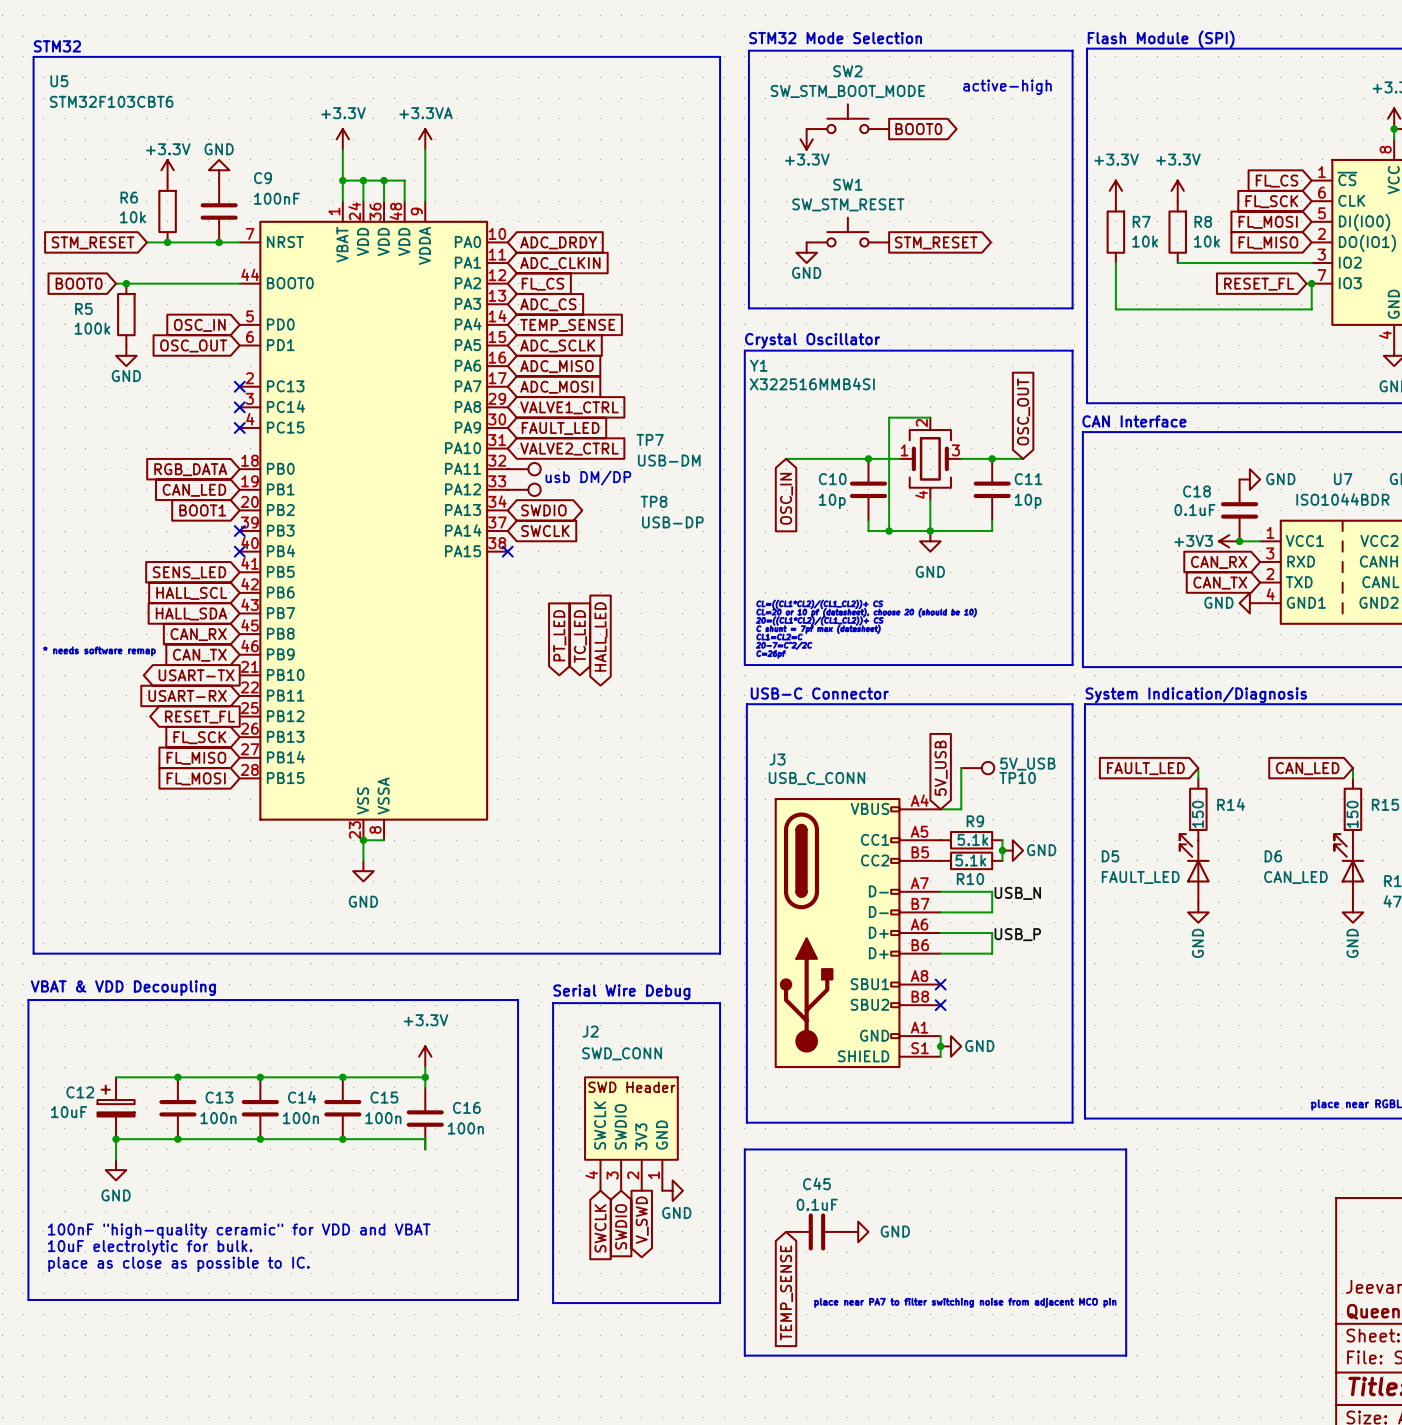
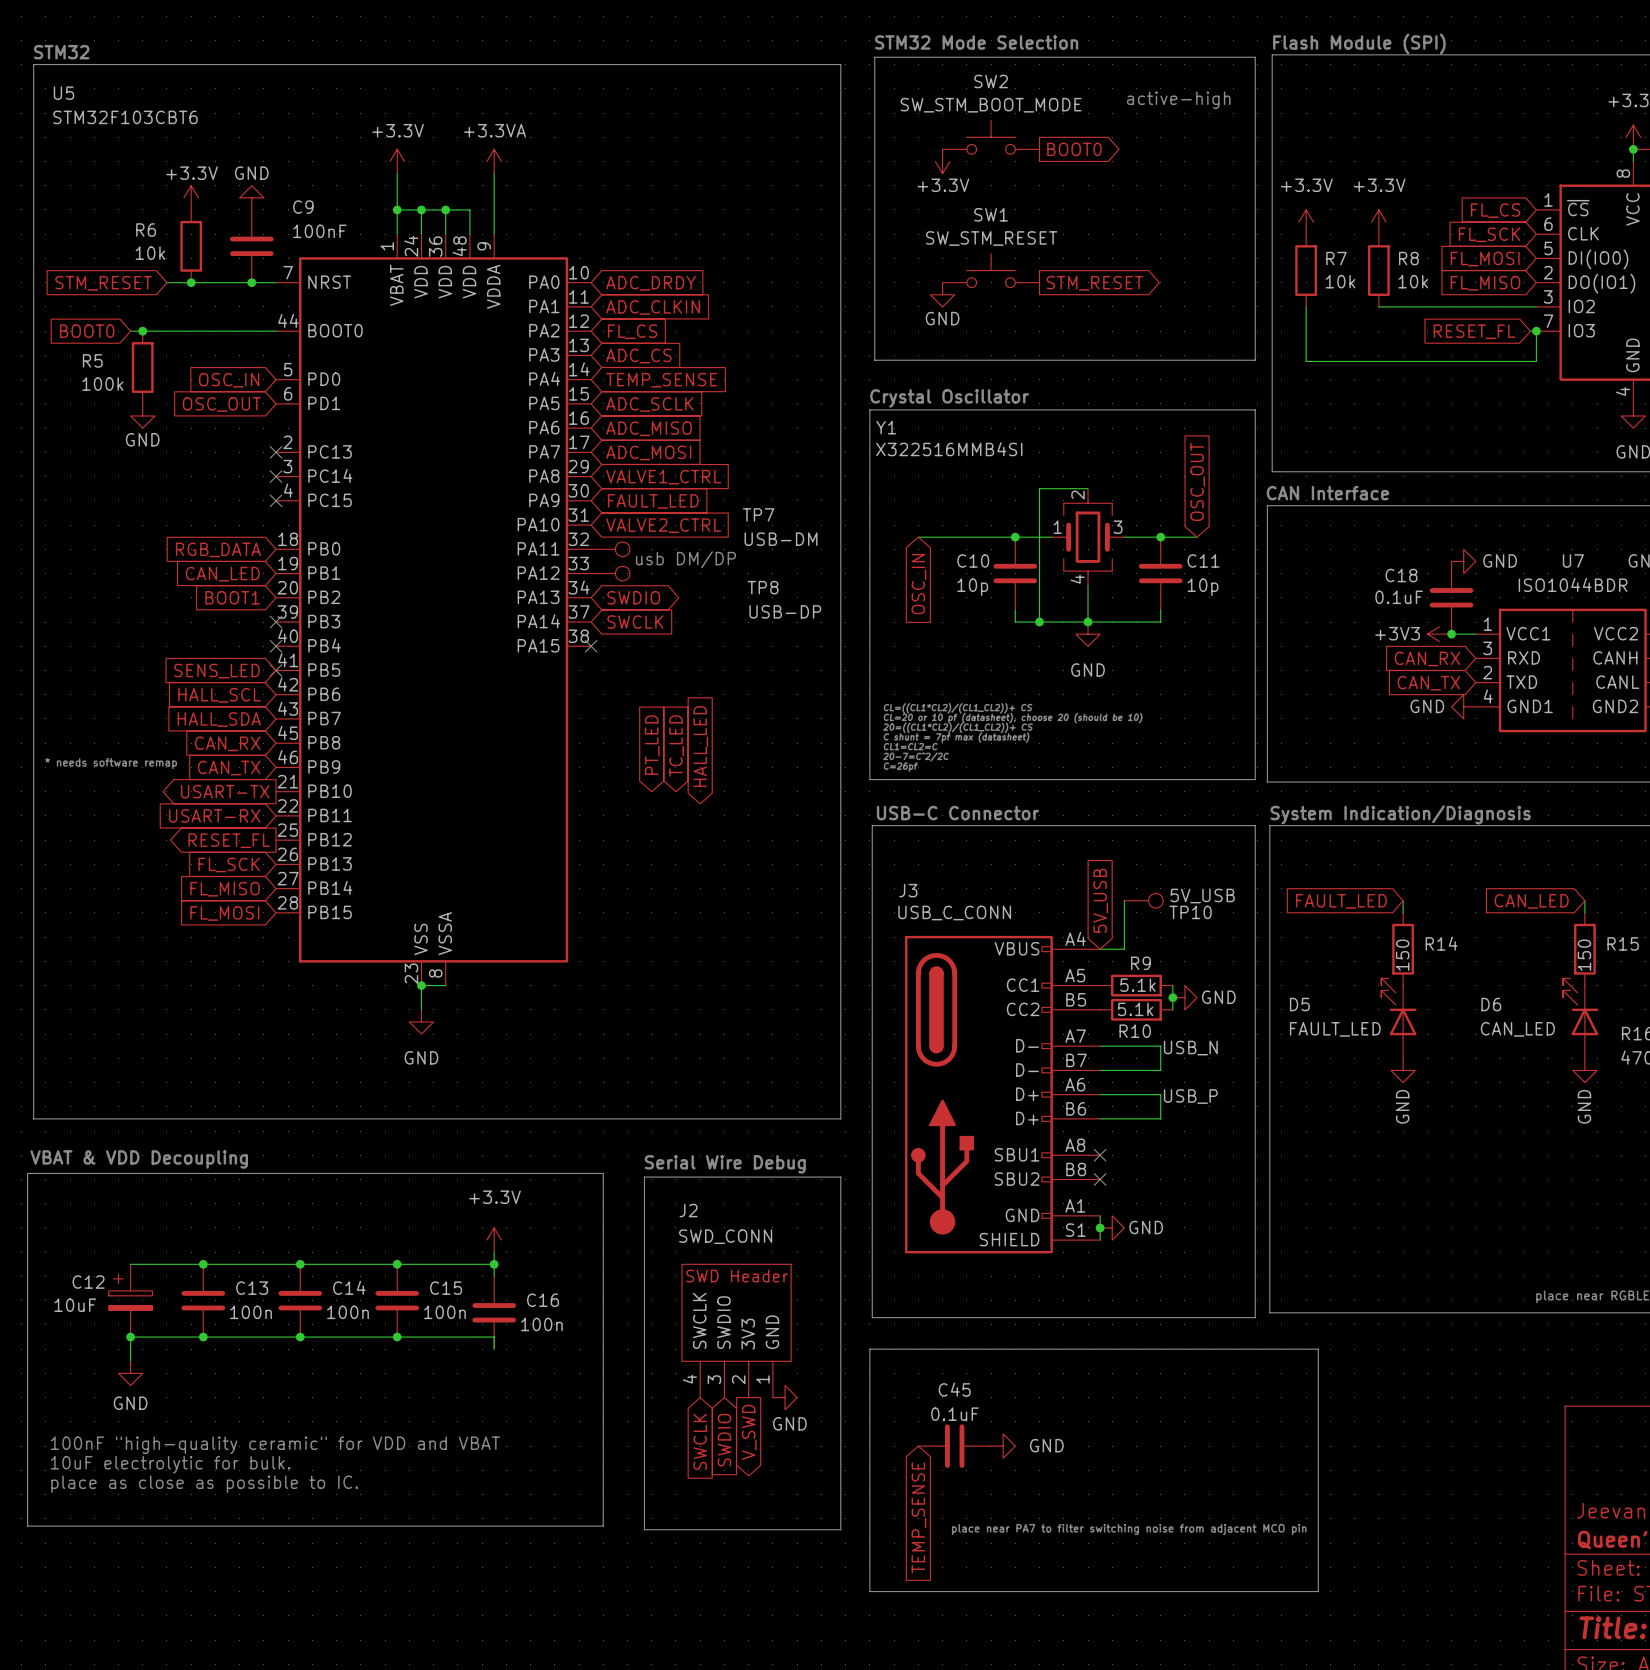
no-connect mark: none -> (276, 670)

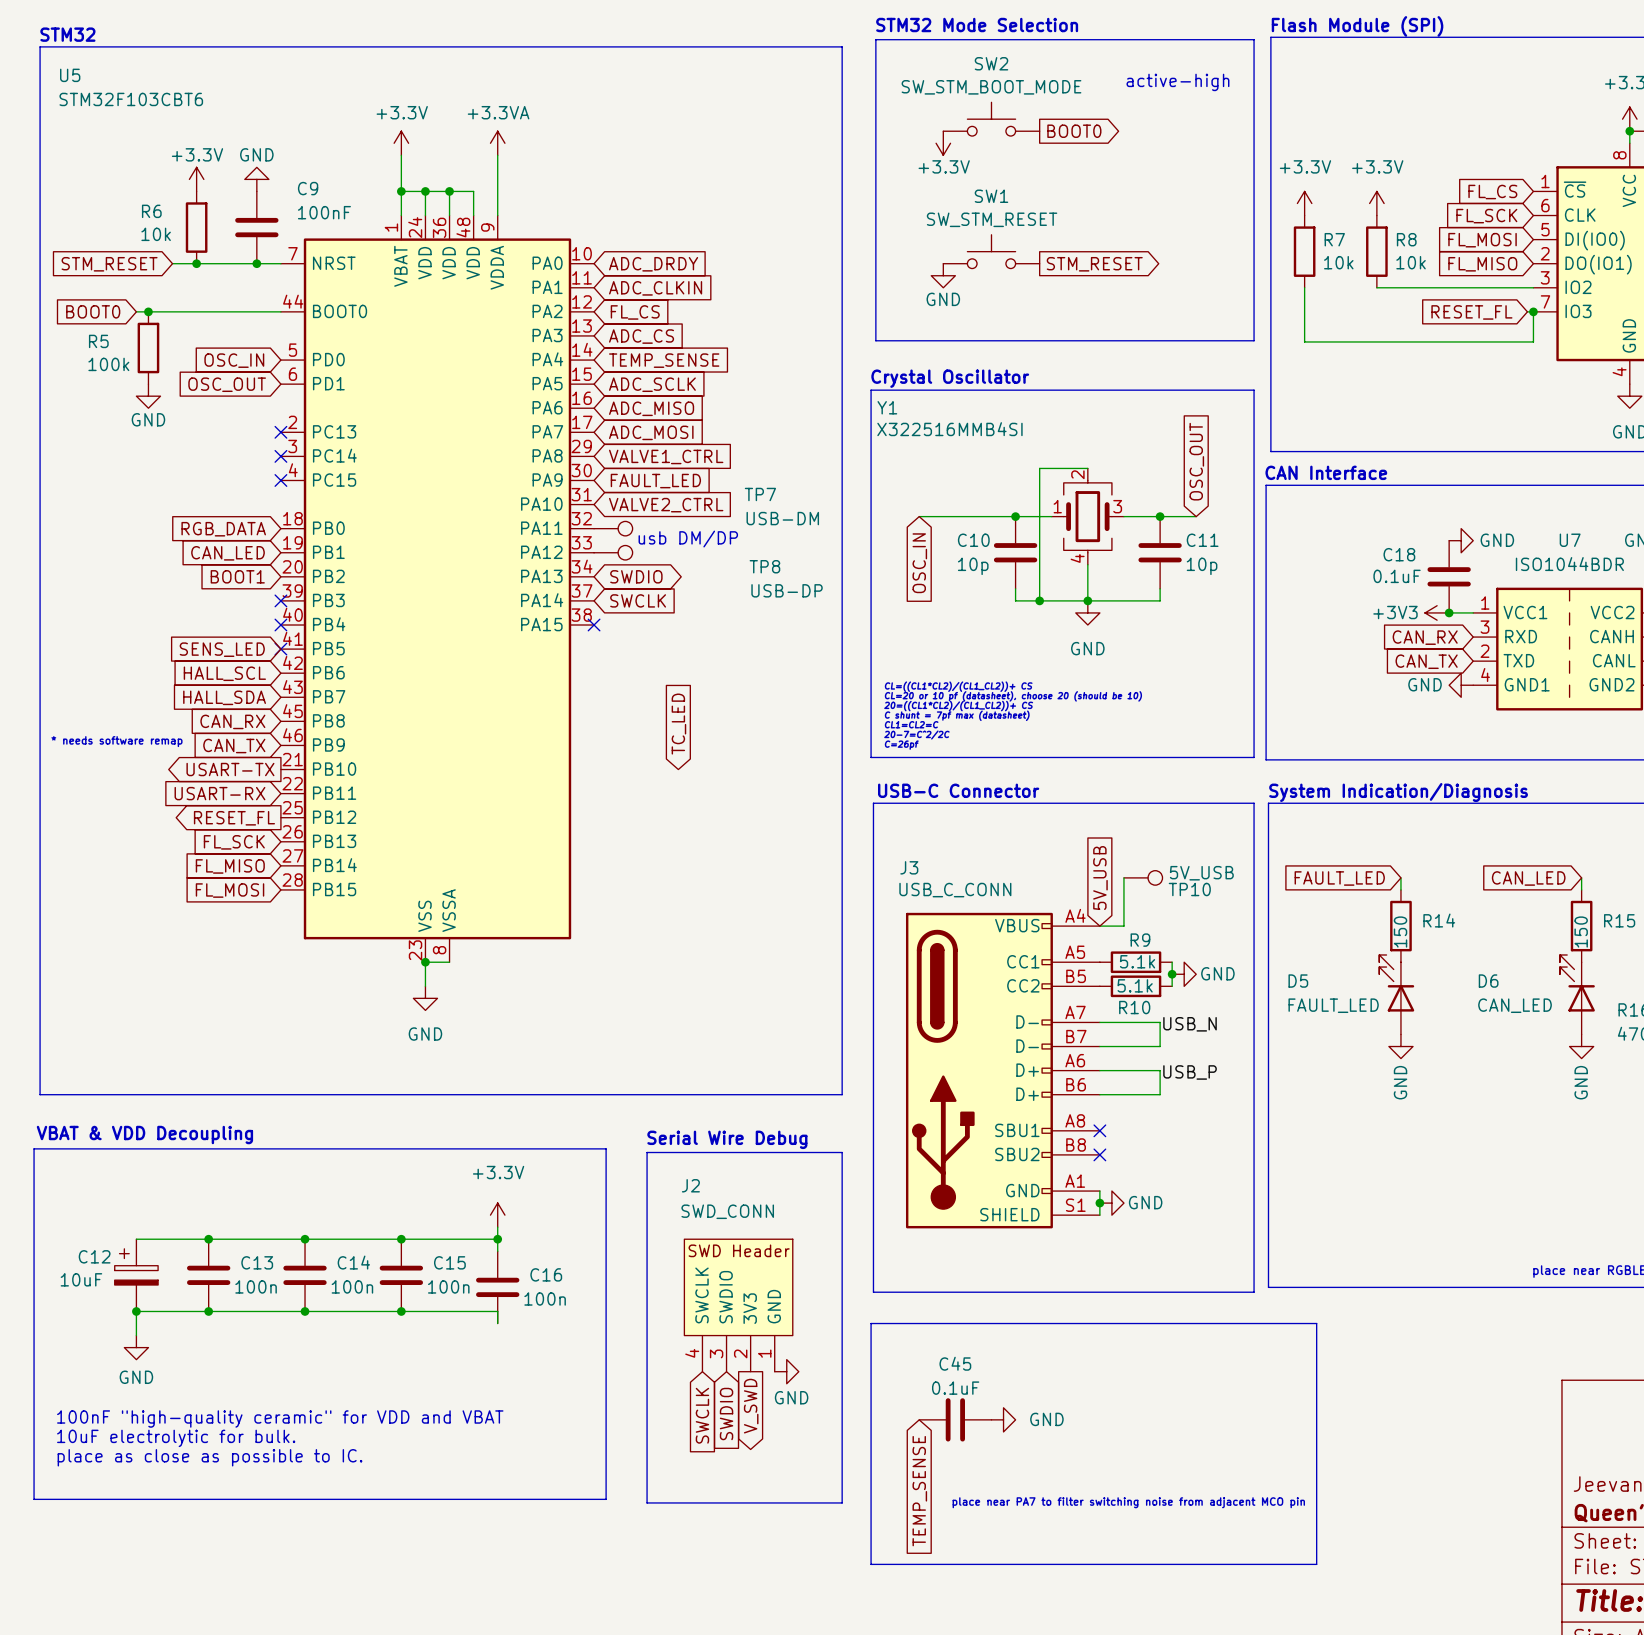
global label: PT_LED (652, 745) -> none
global label: HALL_LED (700, 746) -> none

